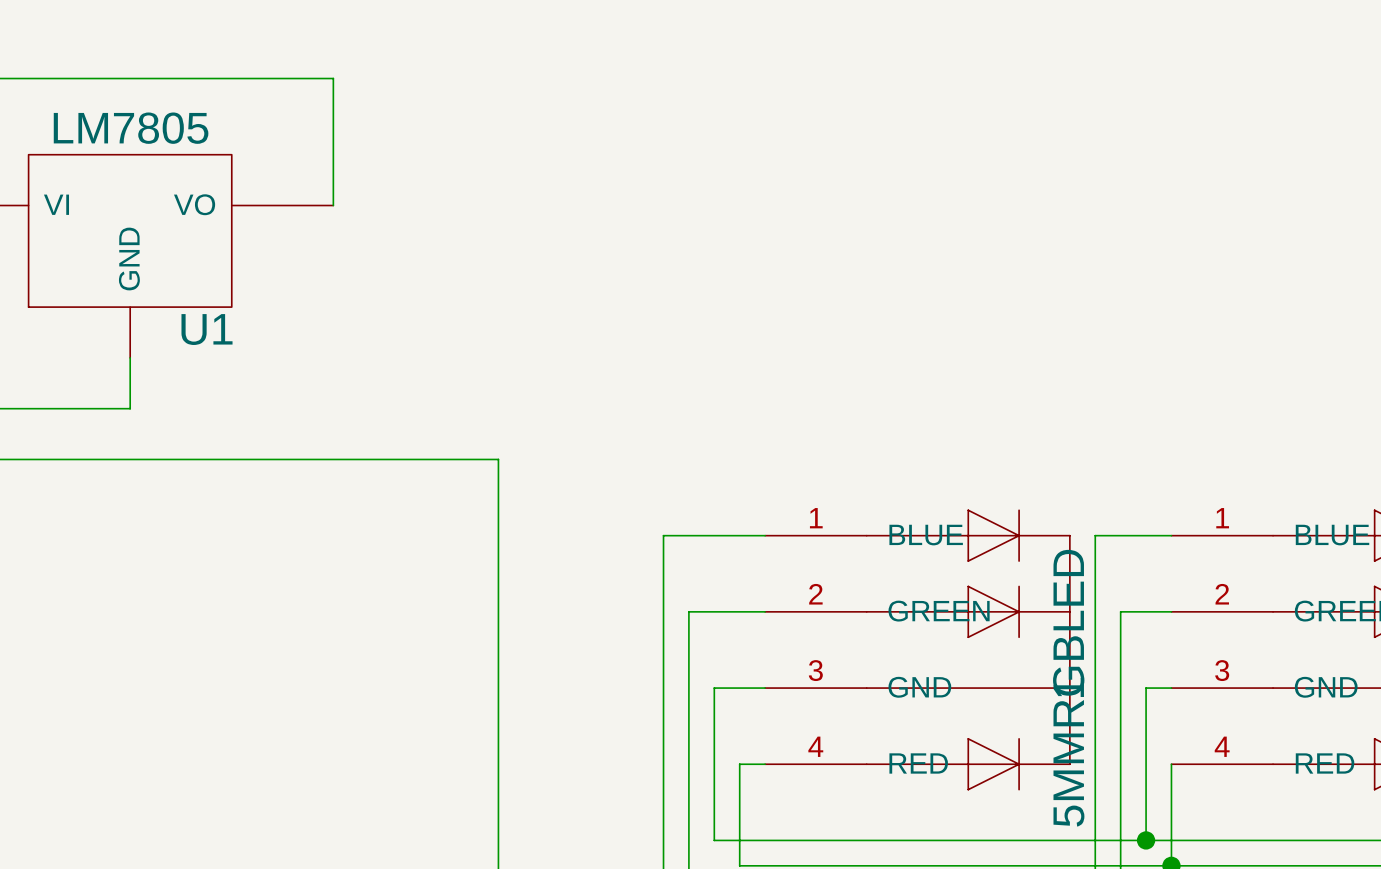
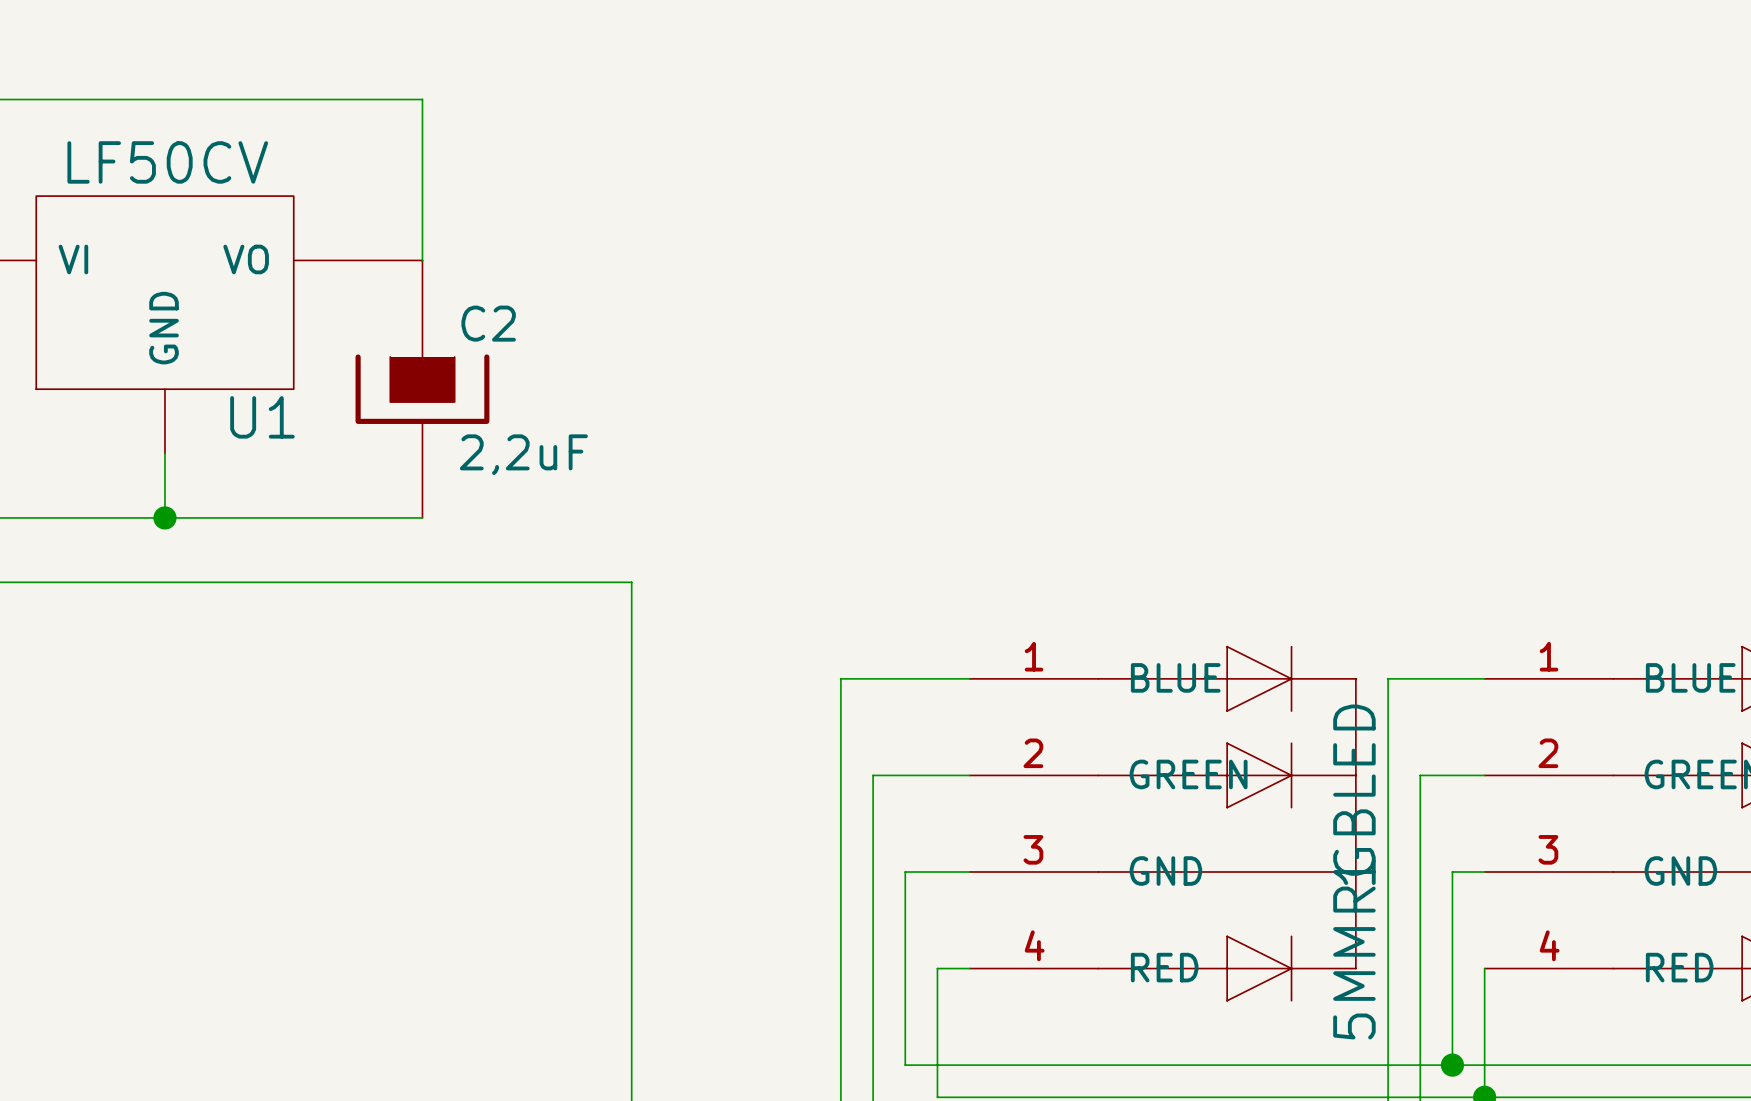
U1 value: LM7805 (131, 128) -> LF50CV (167, 162)
C2: none -> 2,2uF (422, 389)
wire: none -> (164, 517) (422, 517)
junction: none -> (164, 517)

